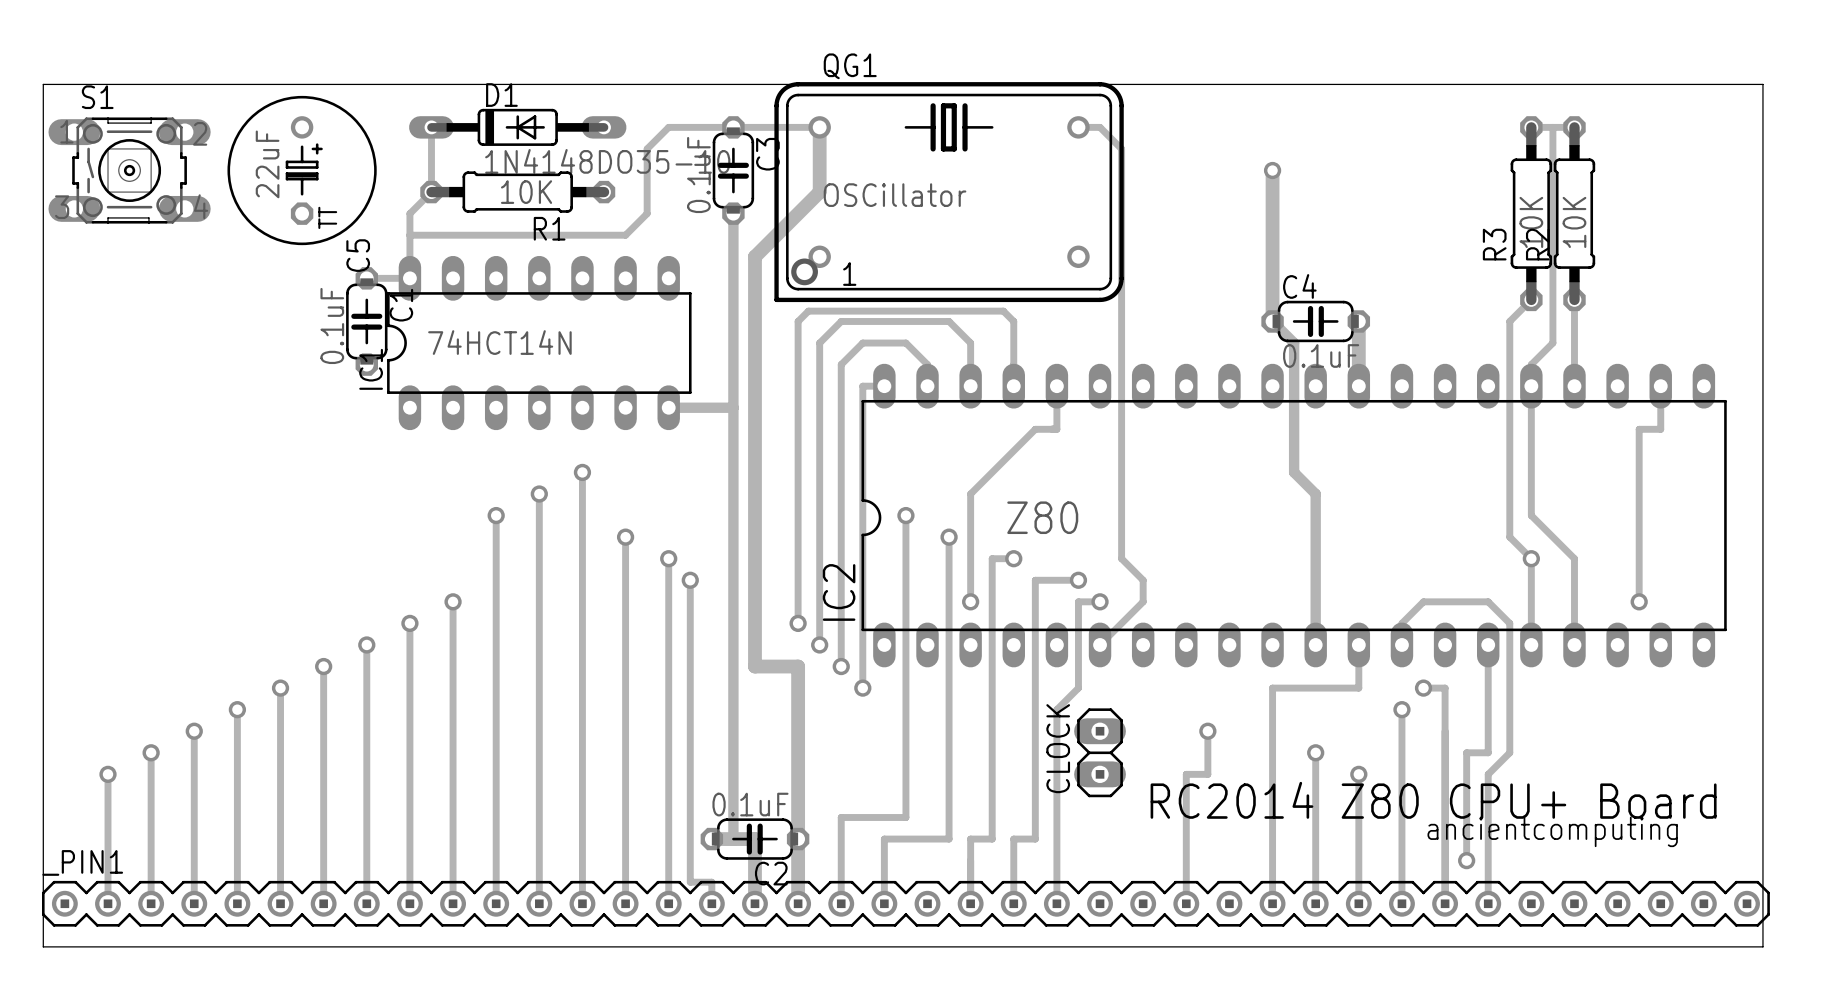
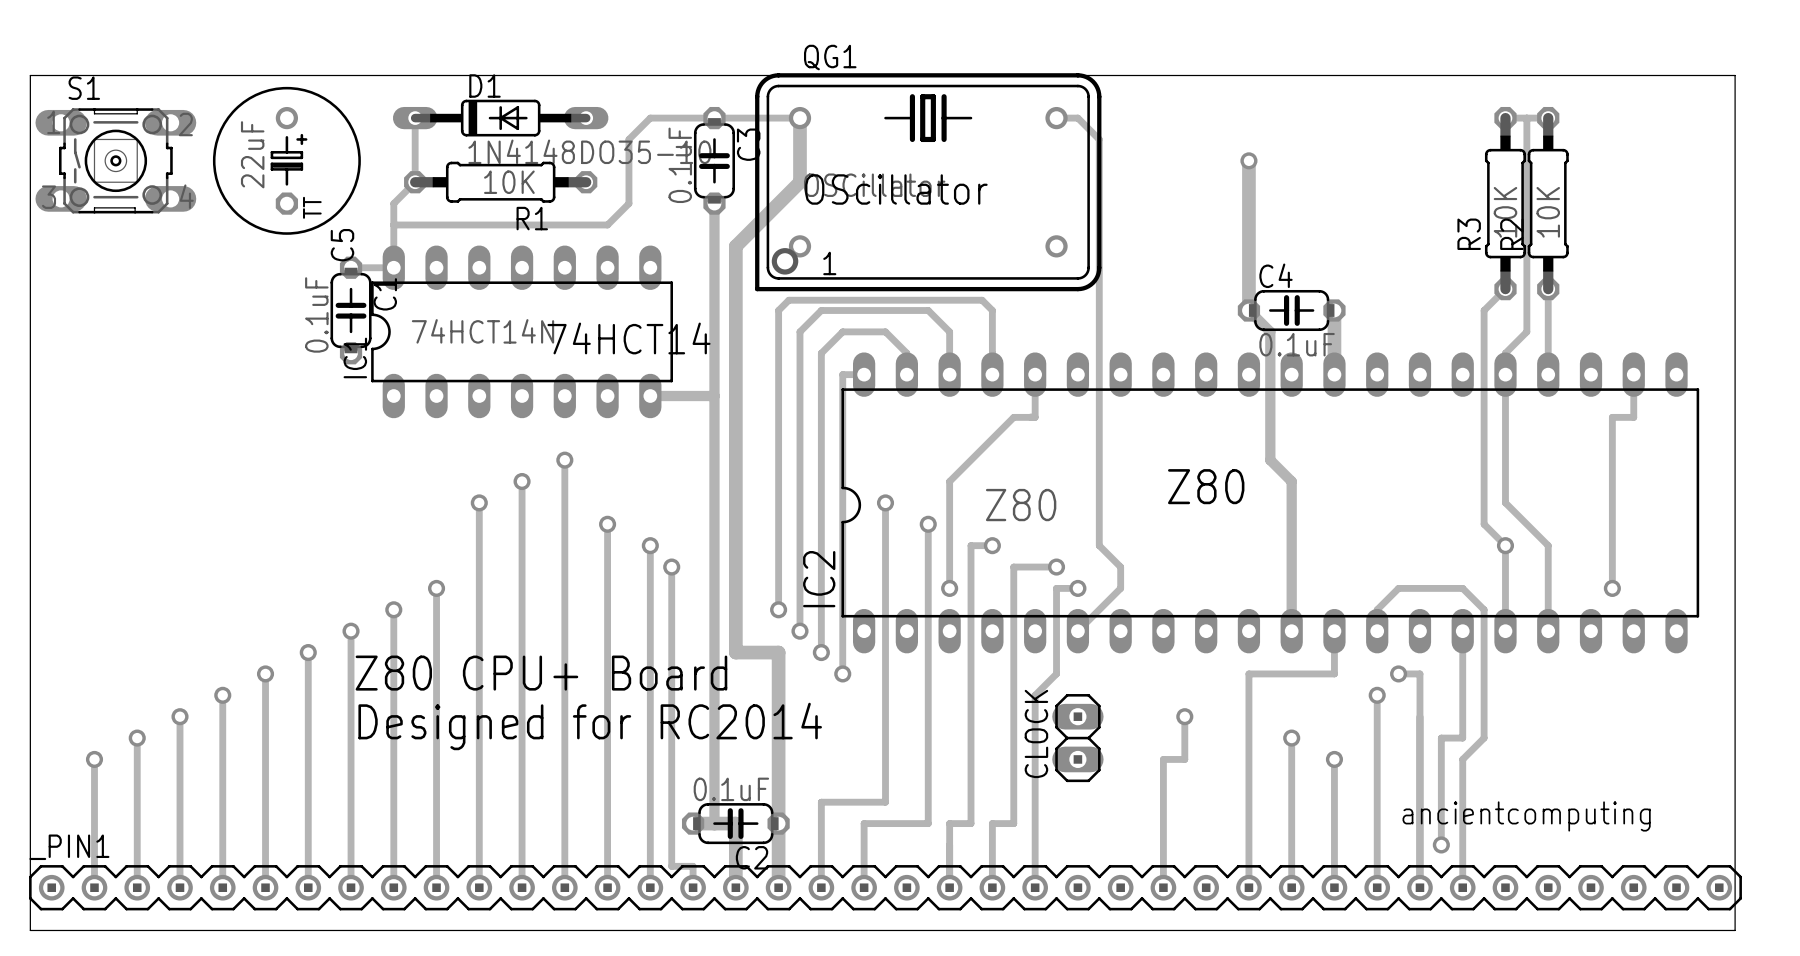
text: none -> OScillator (896, 189)
text: none -> 74HCT14 (628, 338)
text: none -> Z80 (1206, 486)
text: none -> Z80 CPU+ Board (541, 673)
text: none -> Designed for RC2014 (590, 726)
text: RC2014 Z80 CPU+ Board (1433, 800) -> none

